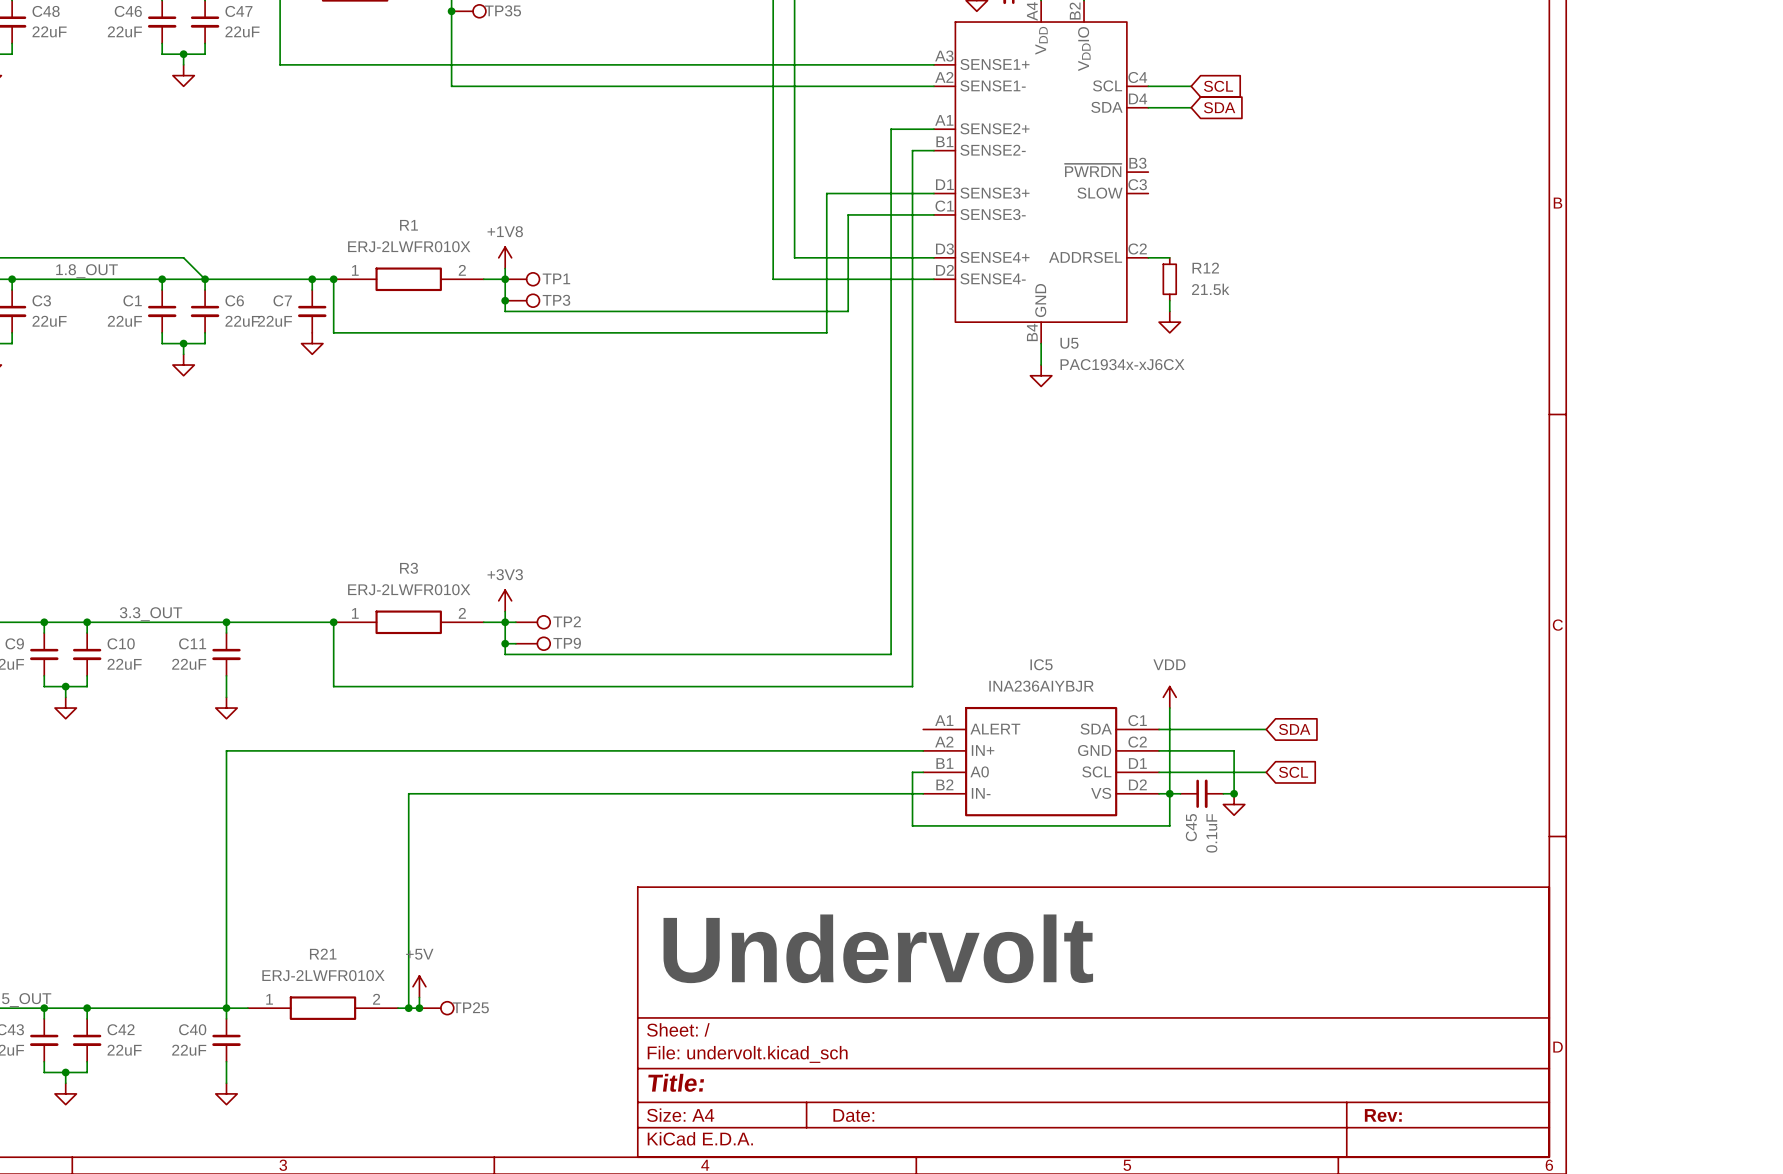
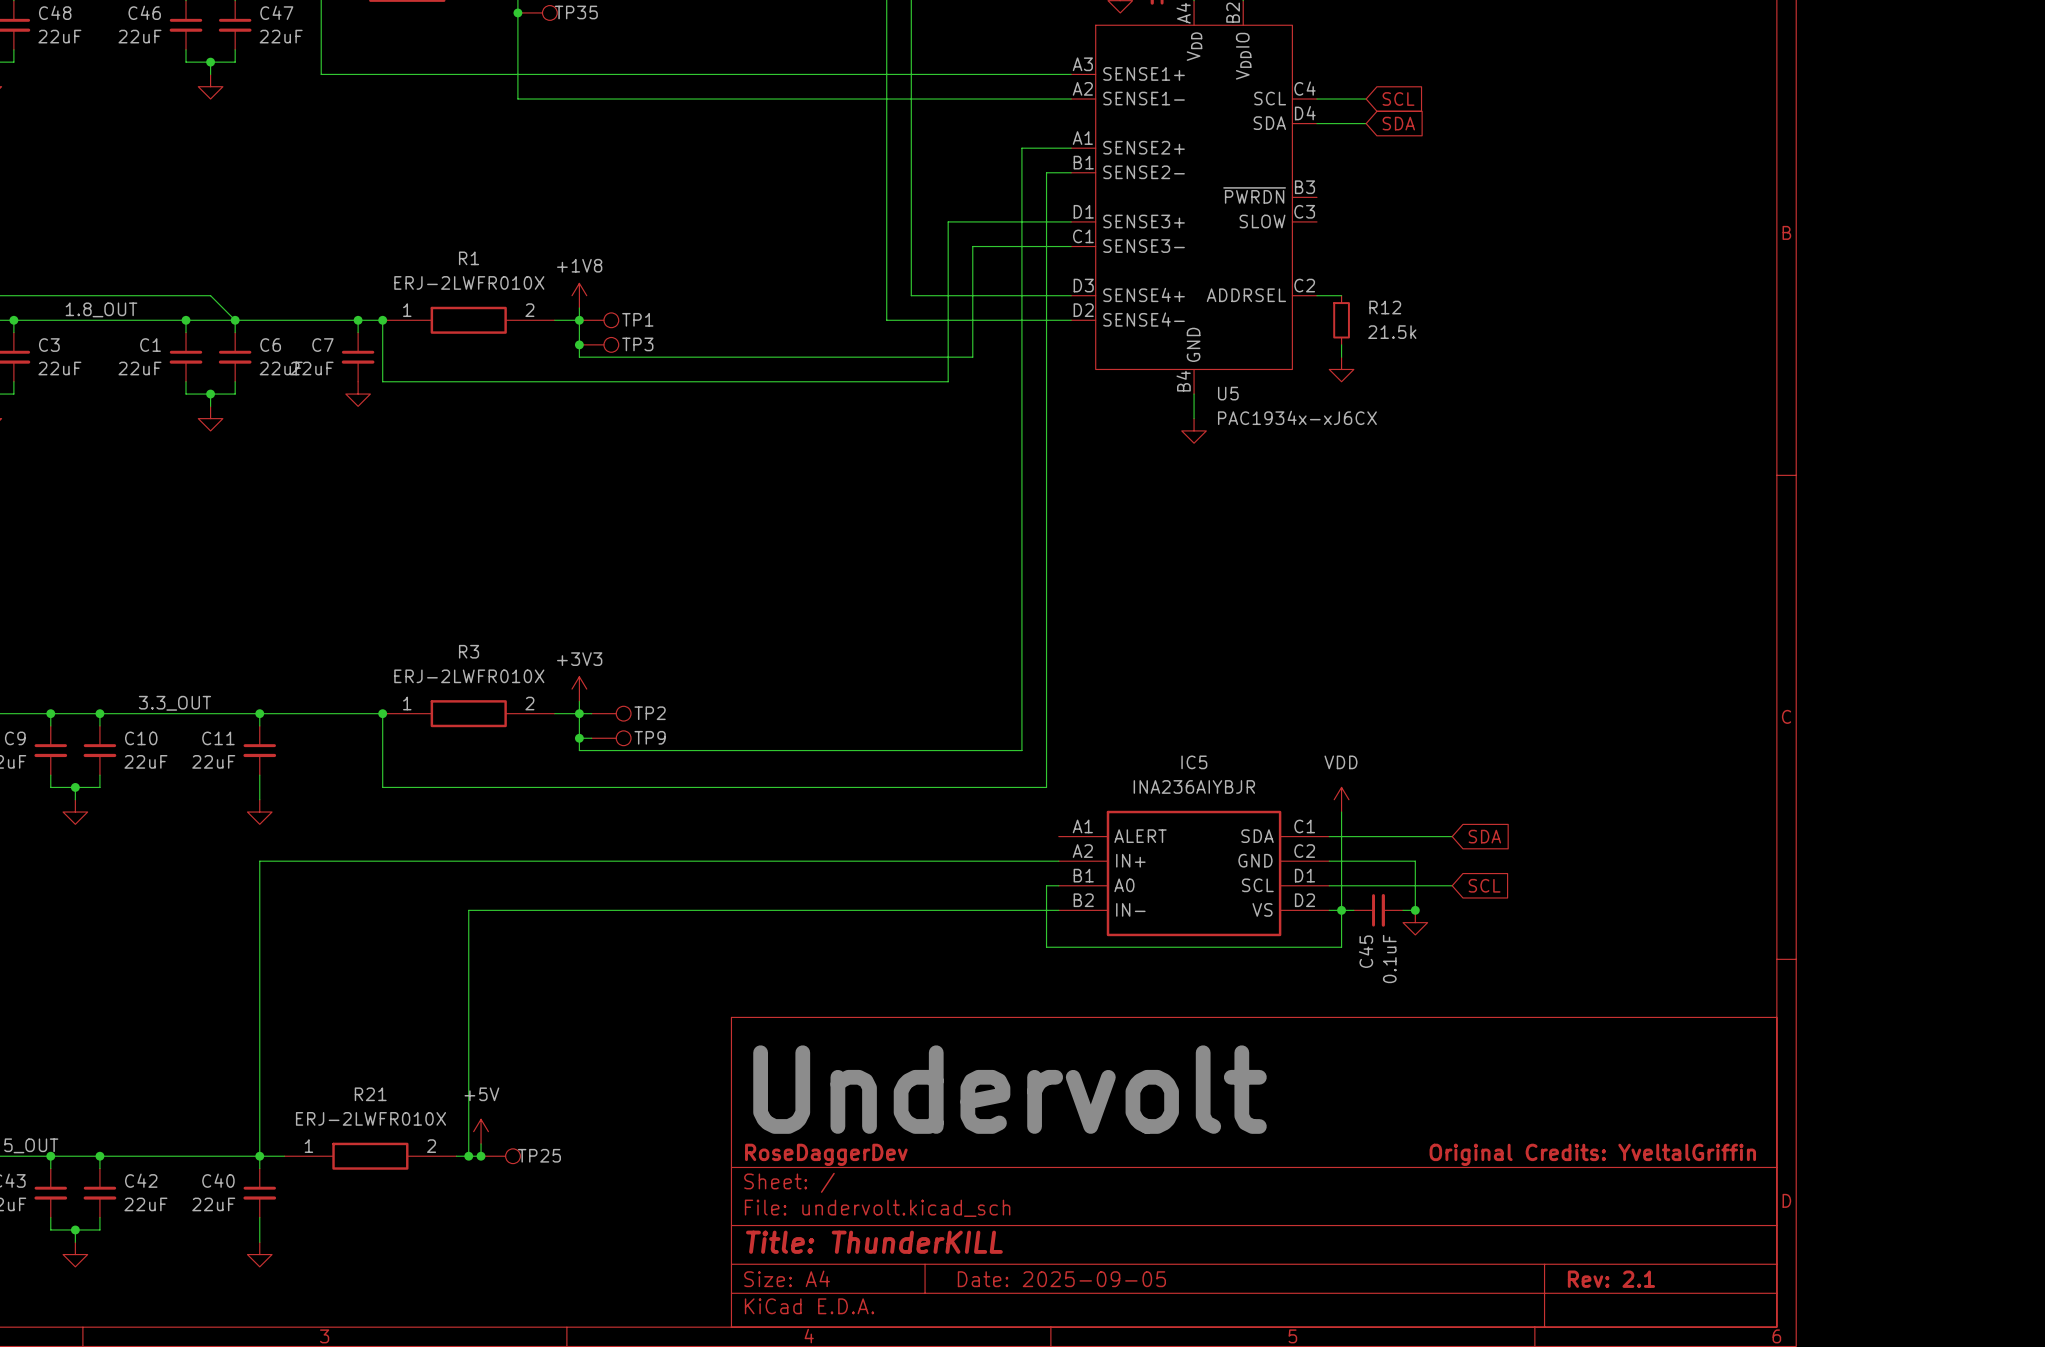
title block: none -> RoseDaggerDev Original Credits: YveltalGriffin (1250, 1154)
title block: Title: (676, 1082) -> Title: ThunderKILL (874, 1242)
title block: Date: (853, 1115) -> Date: 2025-09-05 (1061, 1279)
title block: Rev: (1383, 1115) -> Rev: 2.1 (1611, 1279)

